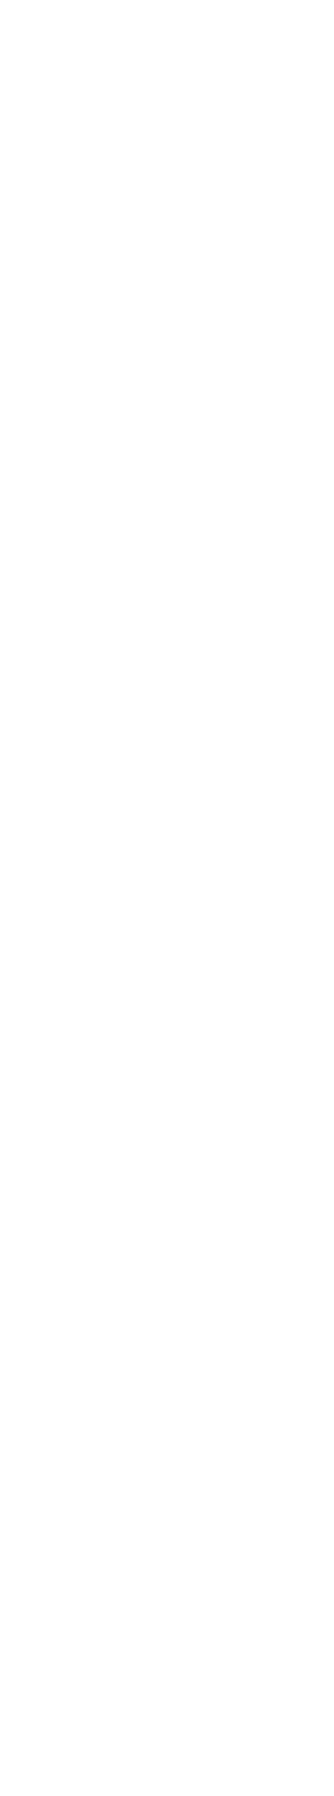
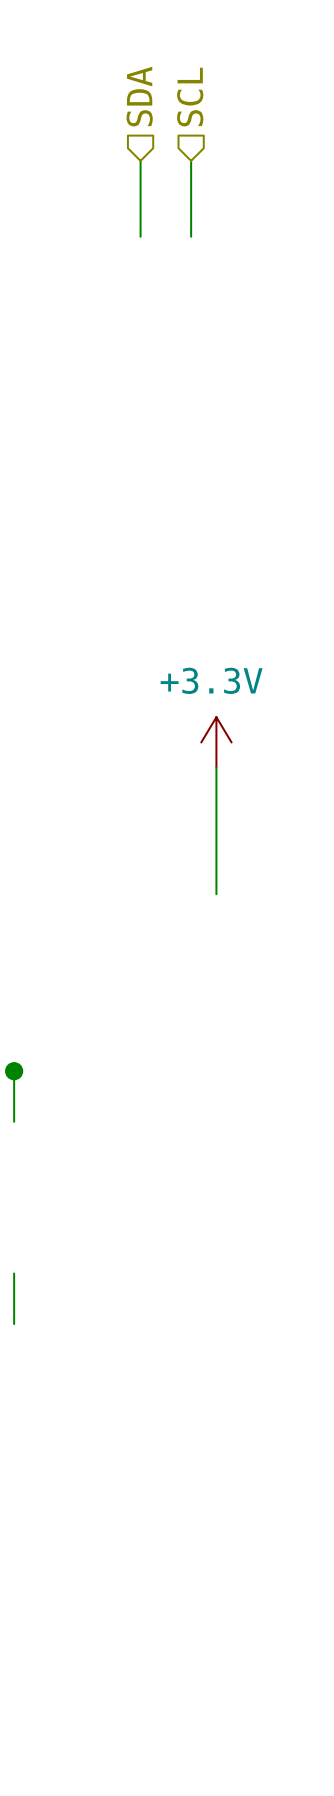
hierarchical label: none -> SDA (139, 96)
hierarchical label: none -> SCL (190, 97)
wire: none -> (140, 160) (140, 236)
wire: none -> (191, 160) (191, 236)
power symbol: none -> +3.3V (216, 742)
wire: none -> (216, 767) (216, 894)
wire: none -> (14, 1071) (14, 1121)
junction: none -> (14, 1071)
wire: none -> (14, 1273) (14, 1324)

